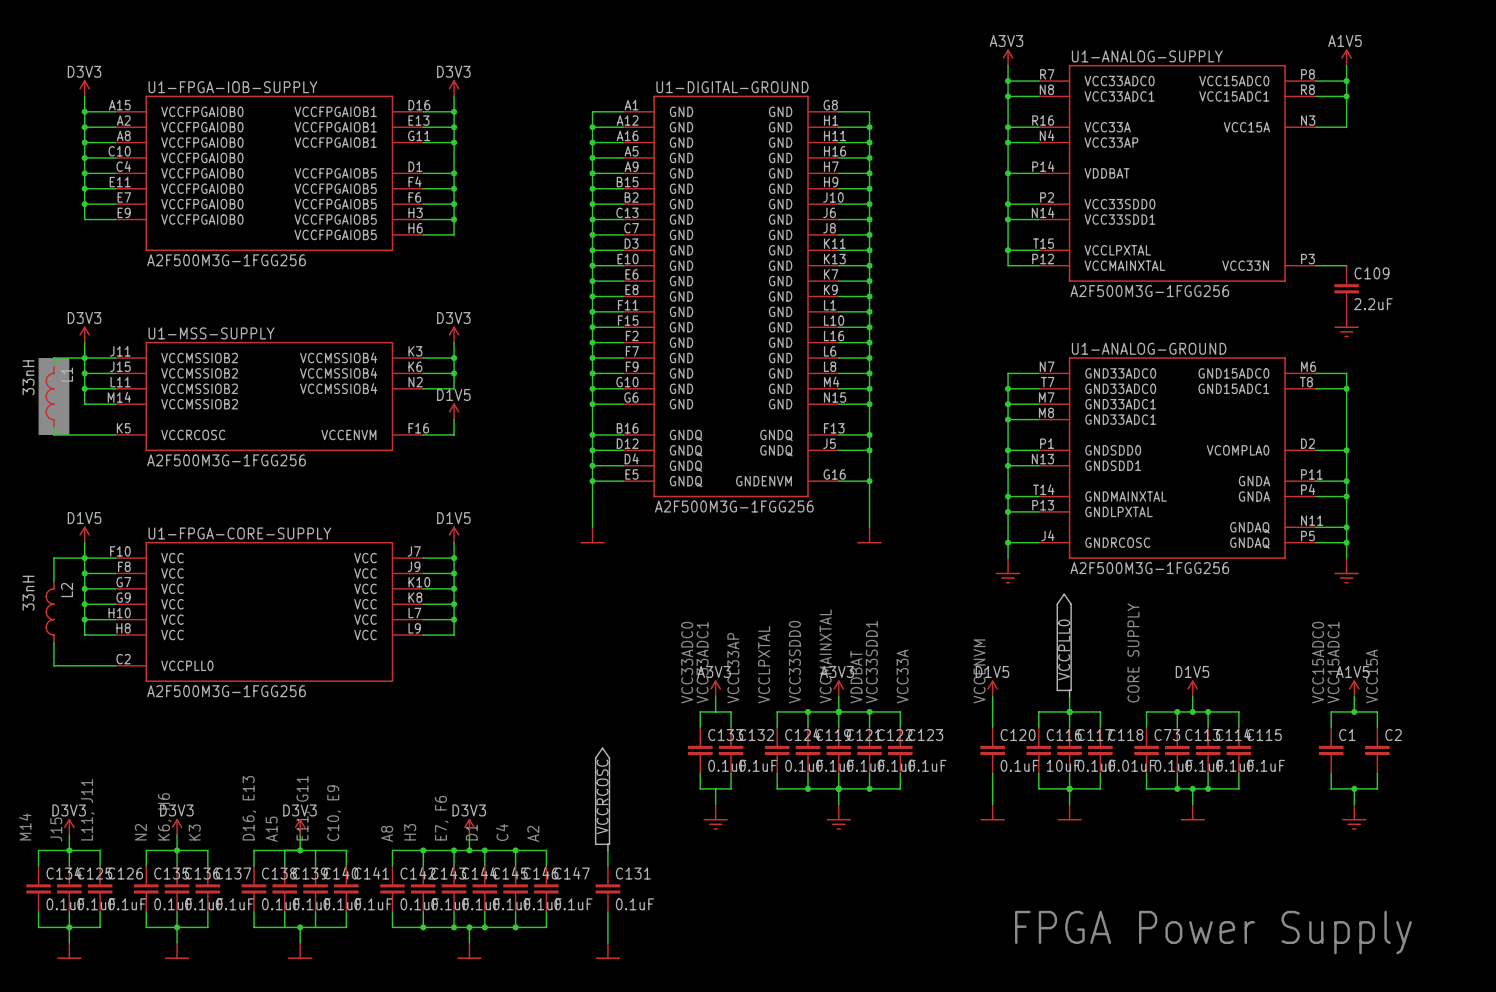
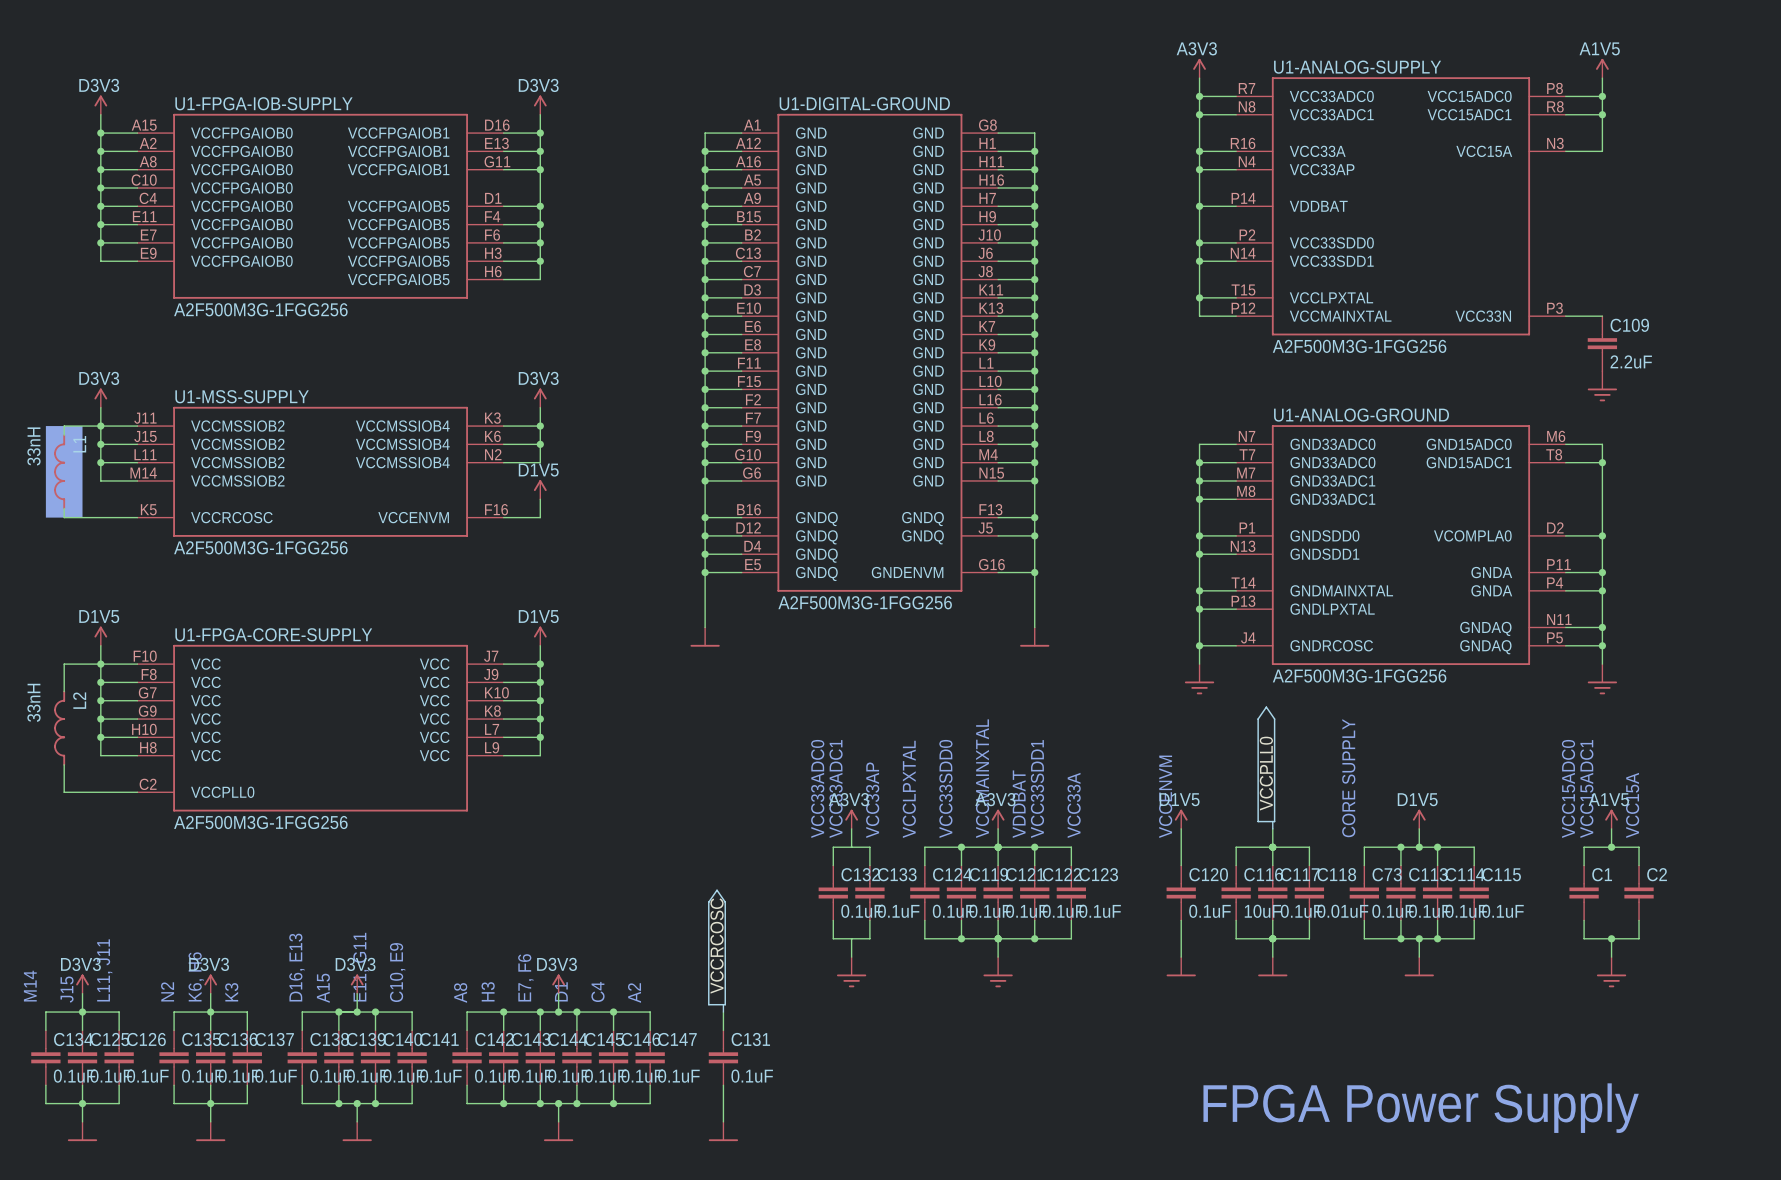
text: VCCL33AP (733, 668) -> VCC33AP (872, 800)
C133 name: C133 (725, 735) -> C132 (860, 874)
C132 name: C132 (756, 735) -> C133 (897, 874)
junction: none -> (338, 1012)
junction: none -> (375, 1012)
junction: none -> (338, 1103)
junction: none -> (375, 1103)

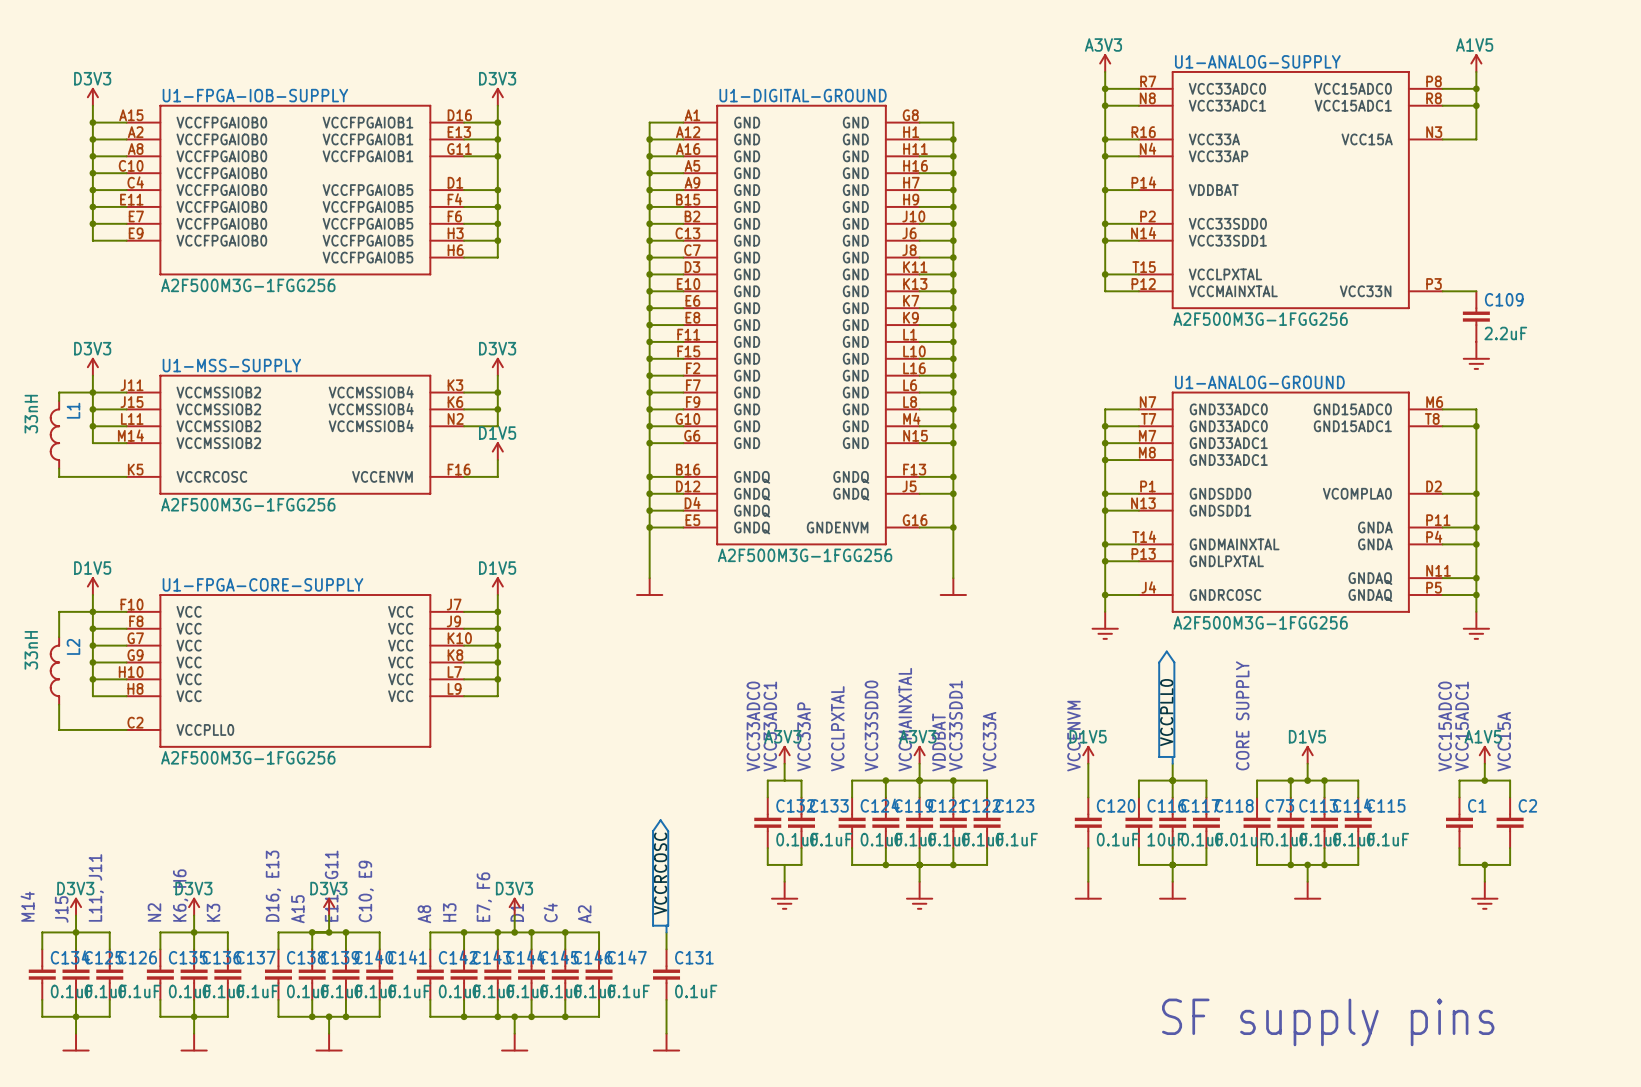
drawing: [45, 426, 83, 518] -> none
text: none -> SF supply pins (1328, 1022)
text: FPGA Power Supply (1421, 1108) -> none

